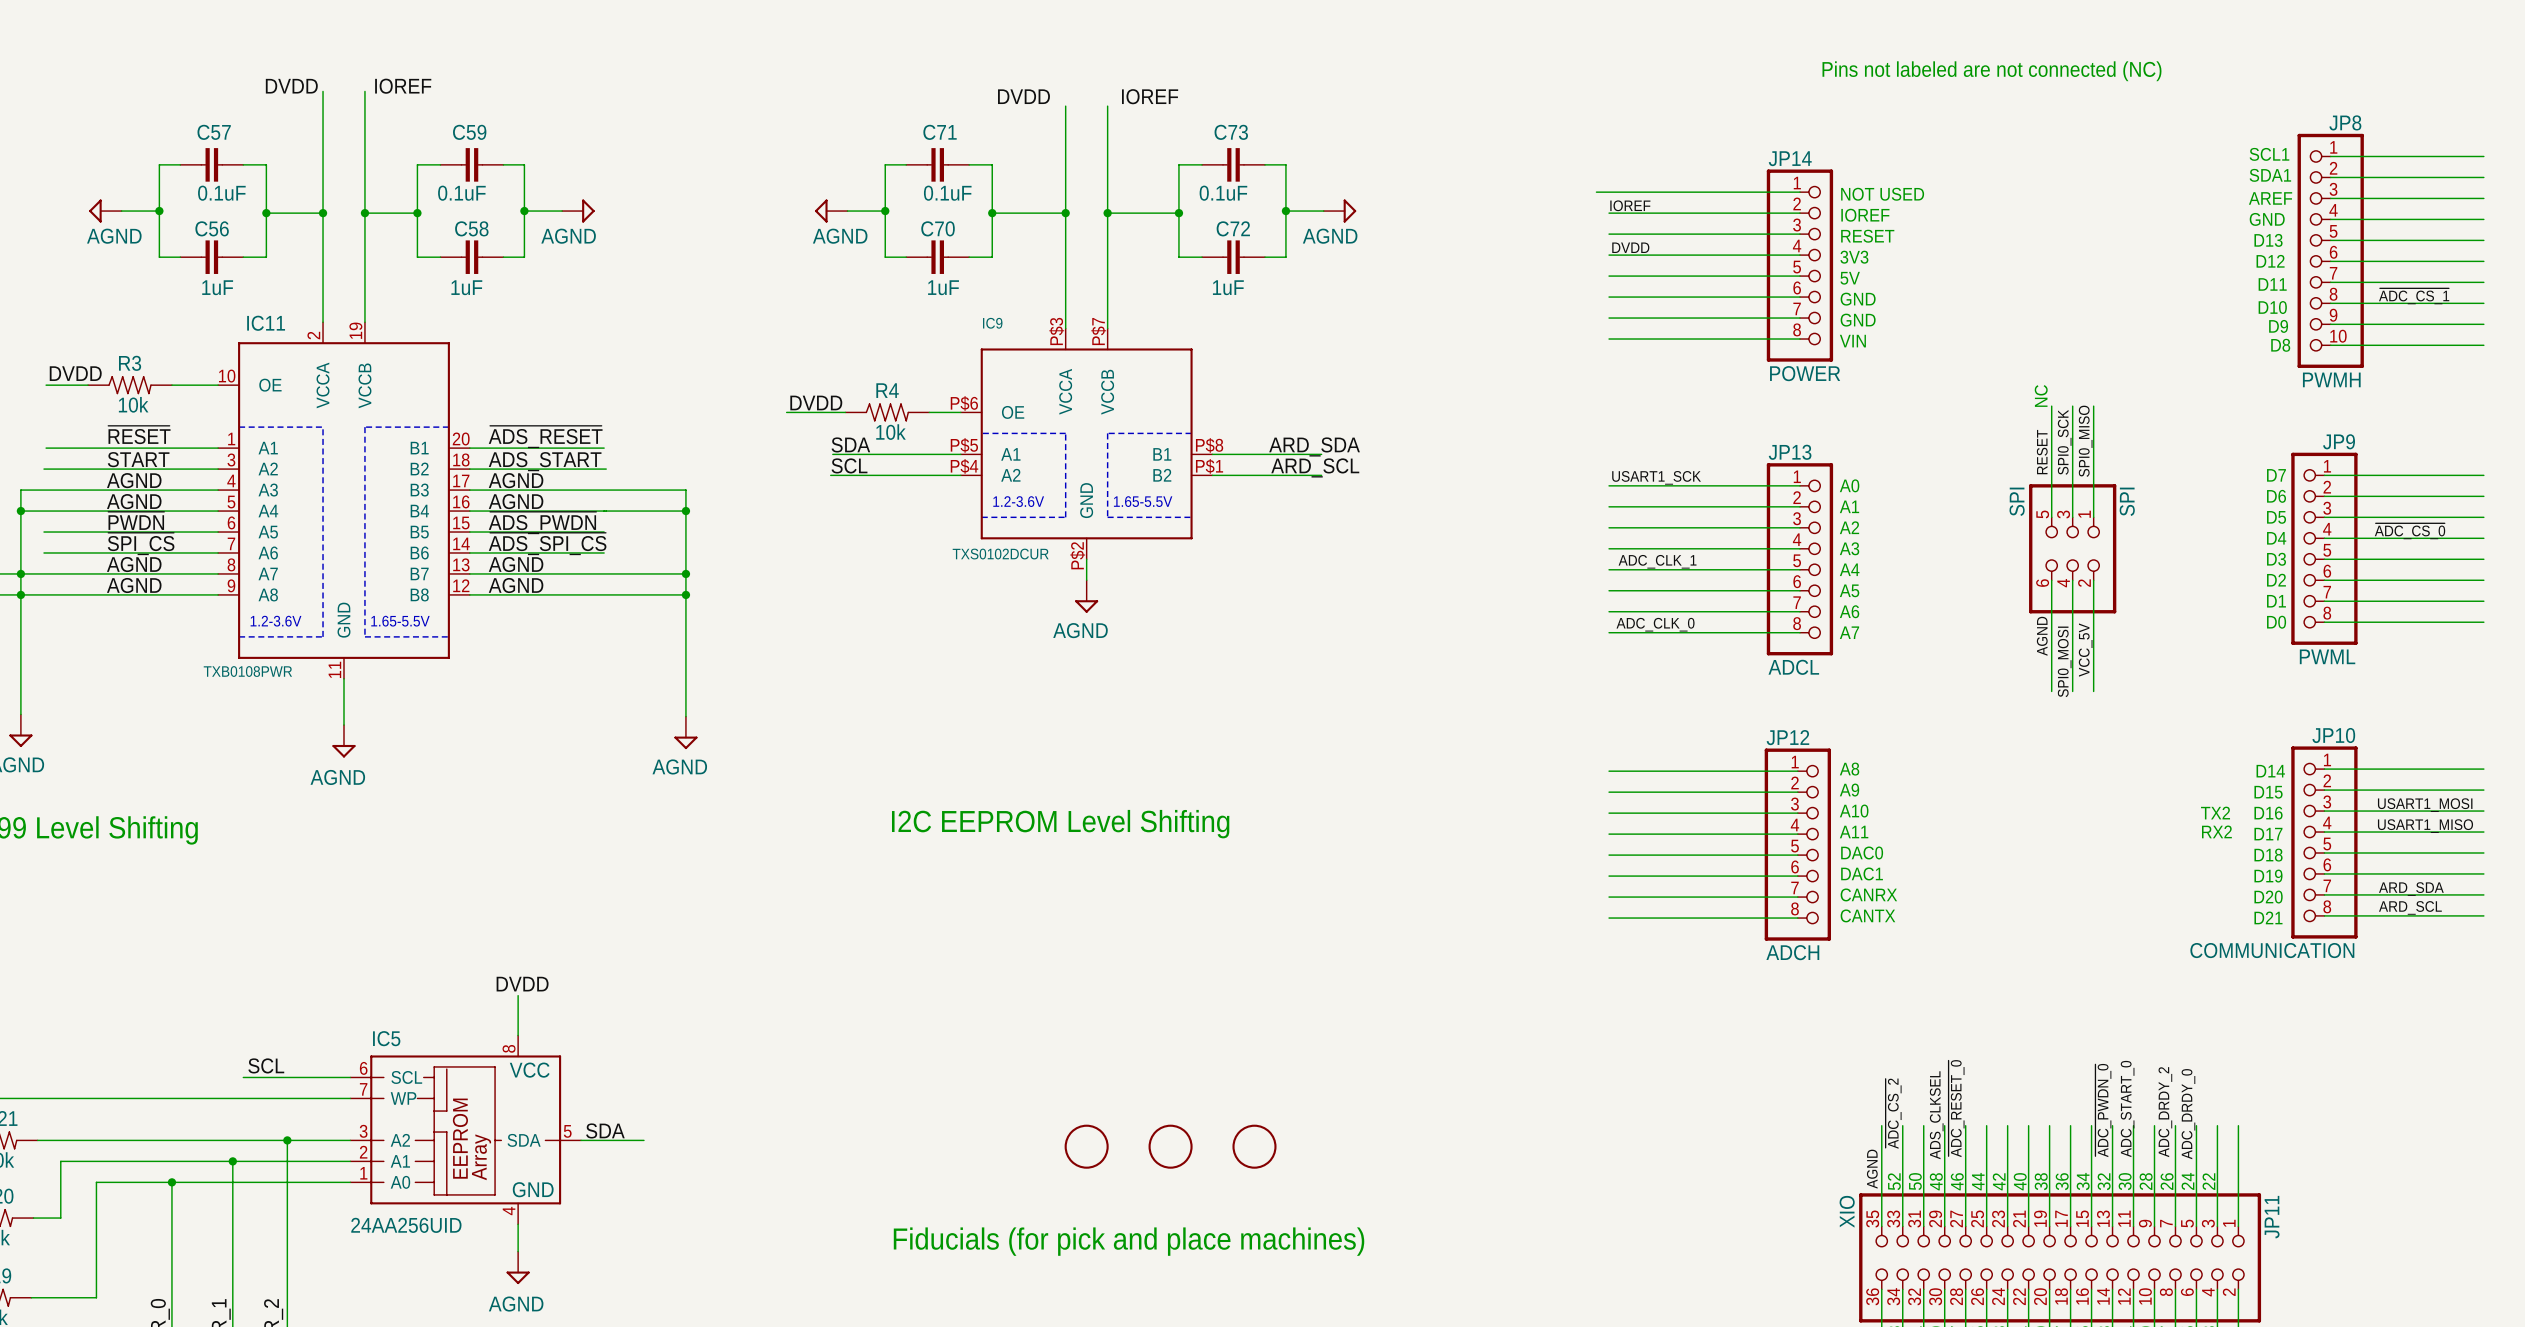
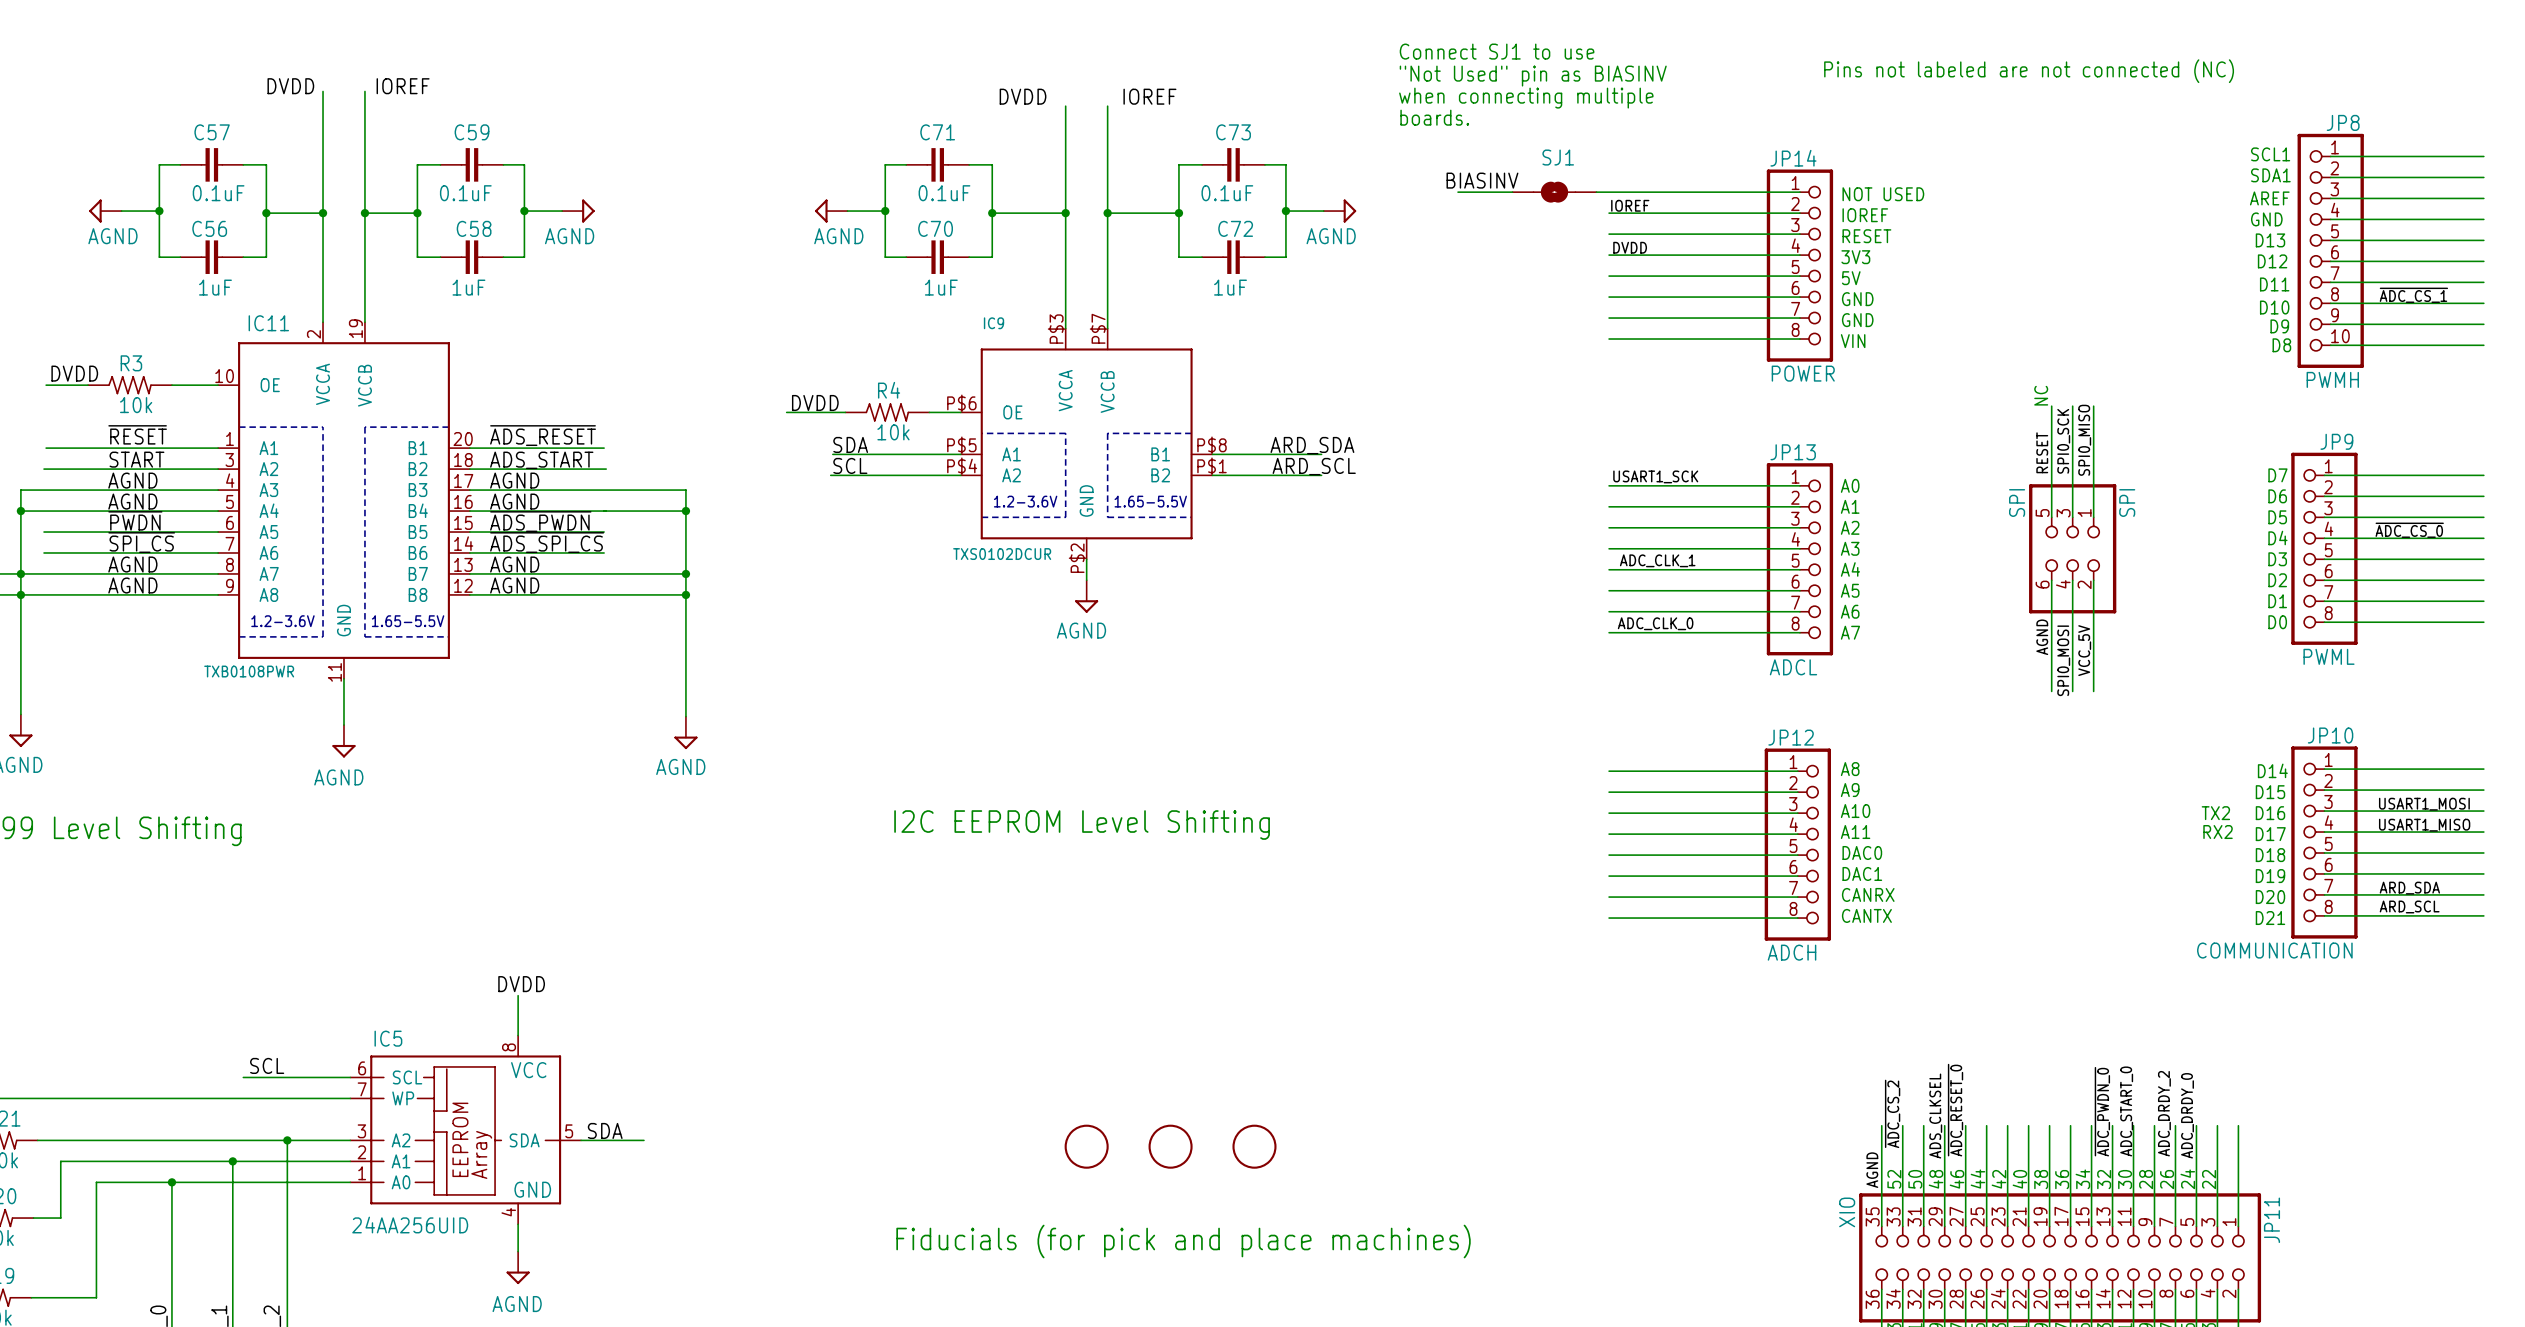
text: none -> Connect SJ1 to use (1497, 51)
text: none -> "Not Used" pin as BIASINV (1533, 76)
text: none -> when connecting multiple (1526, 98)
text: none -> boards. (1434, 117)
label: none -> BIASINV (1482, 180)
wire: none -> (1457, 192) (1512, 192)
SJ1: none -> (1554, 192)

